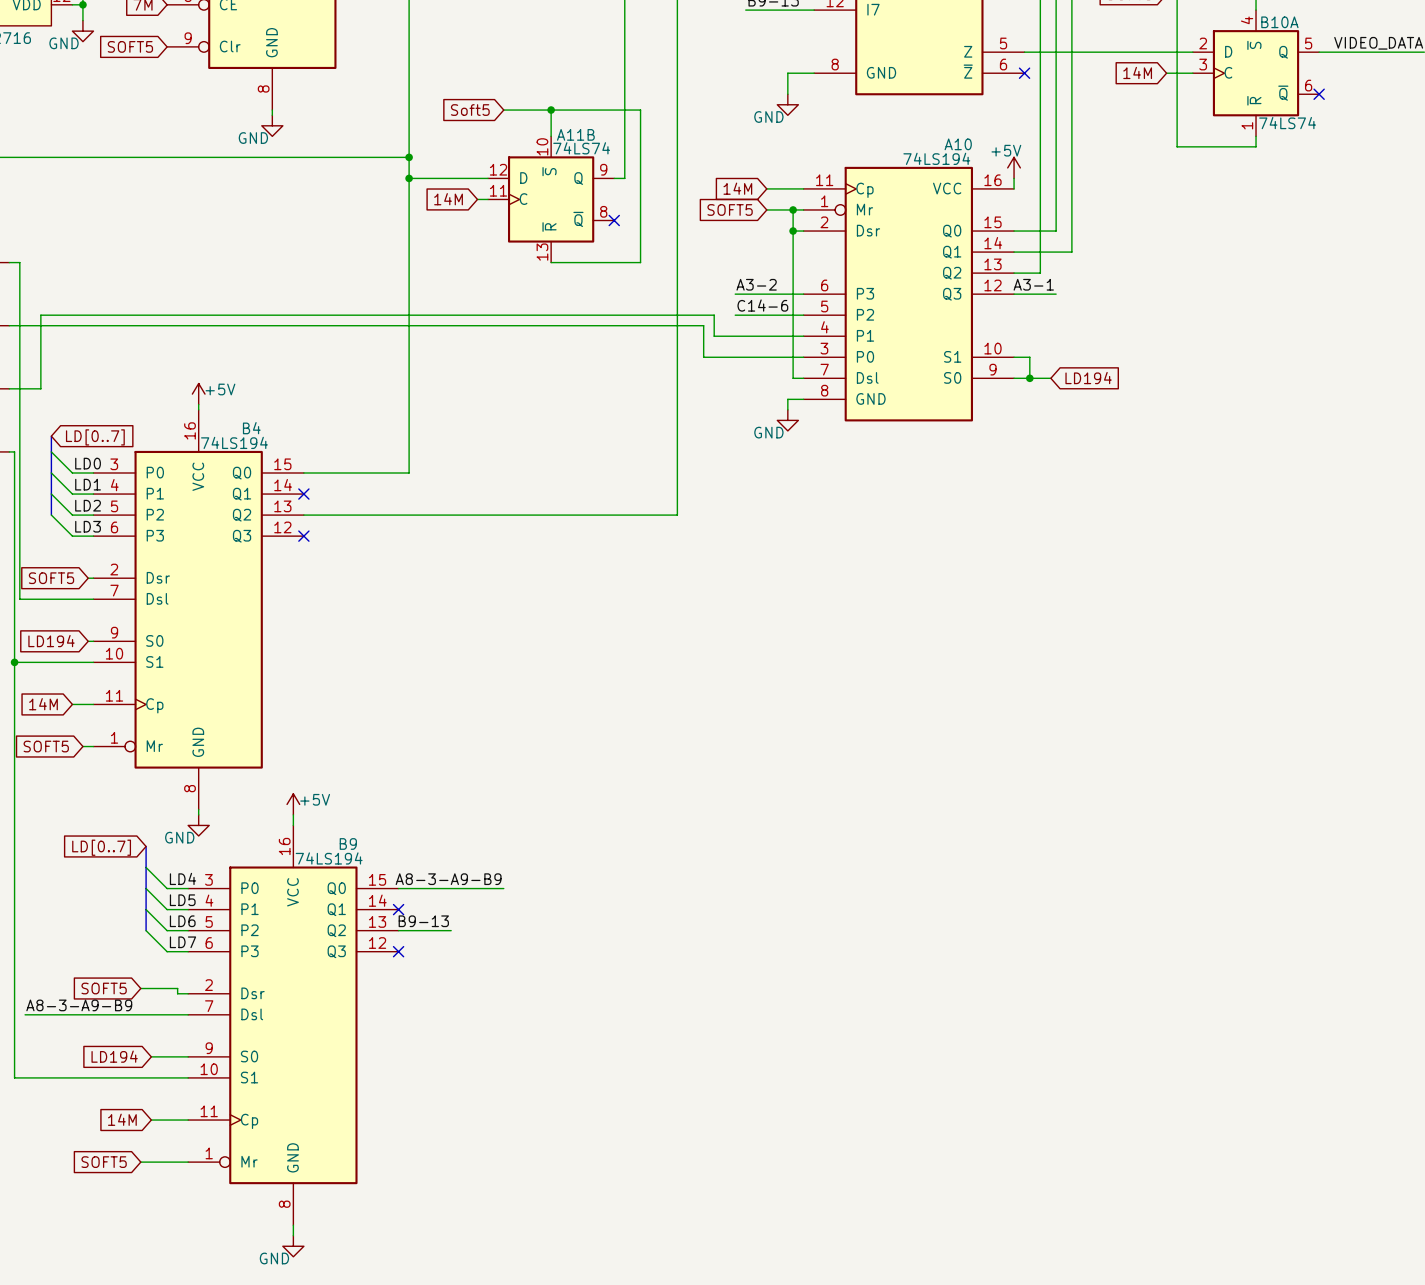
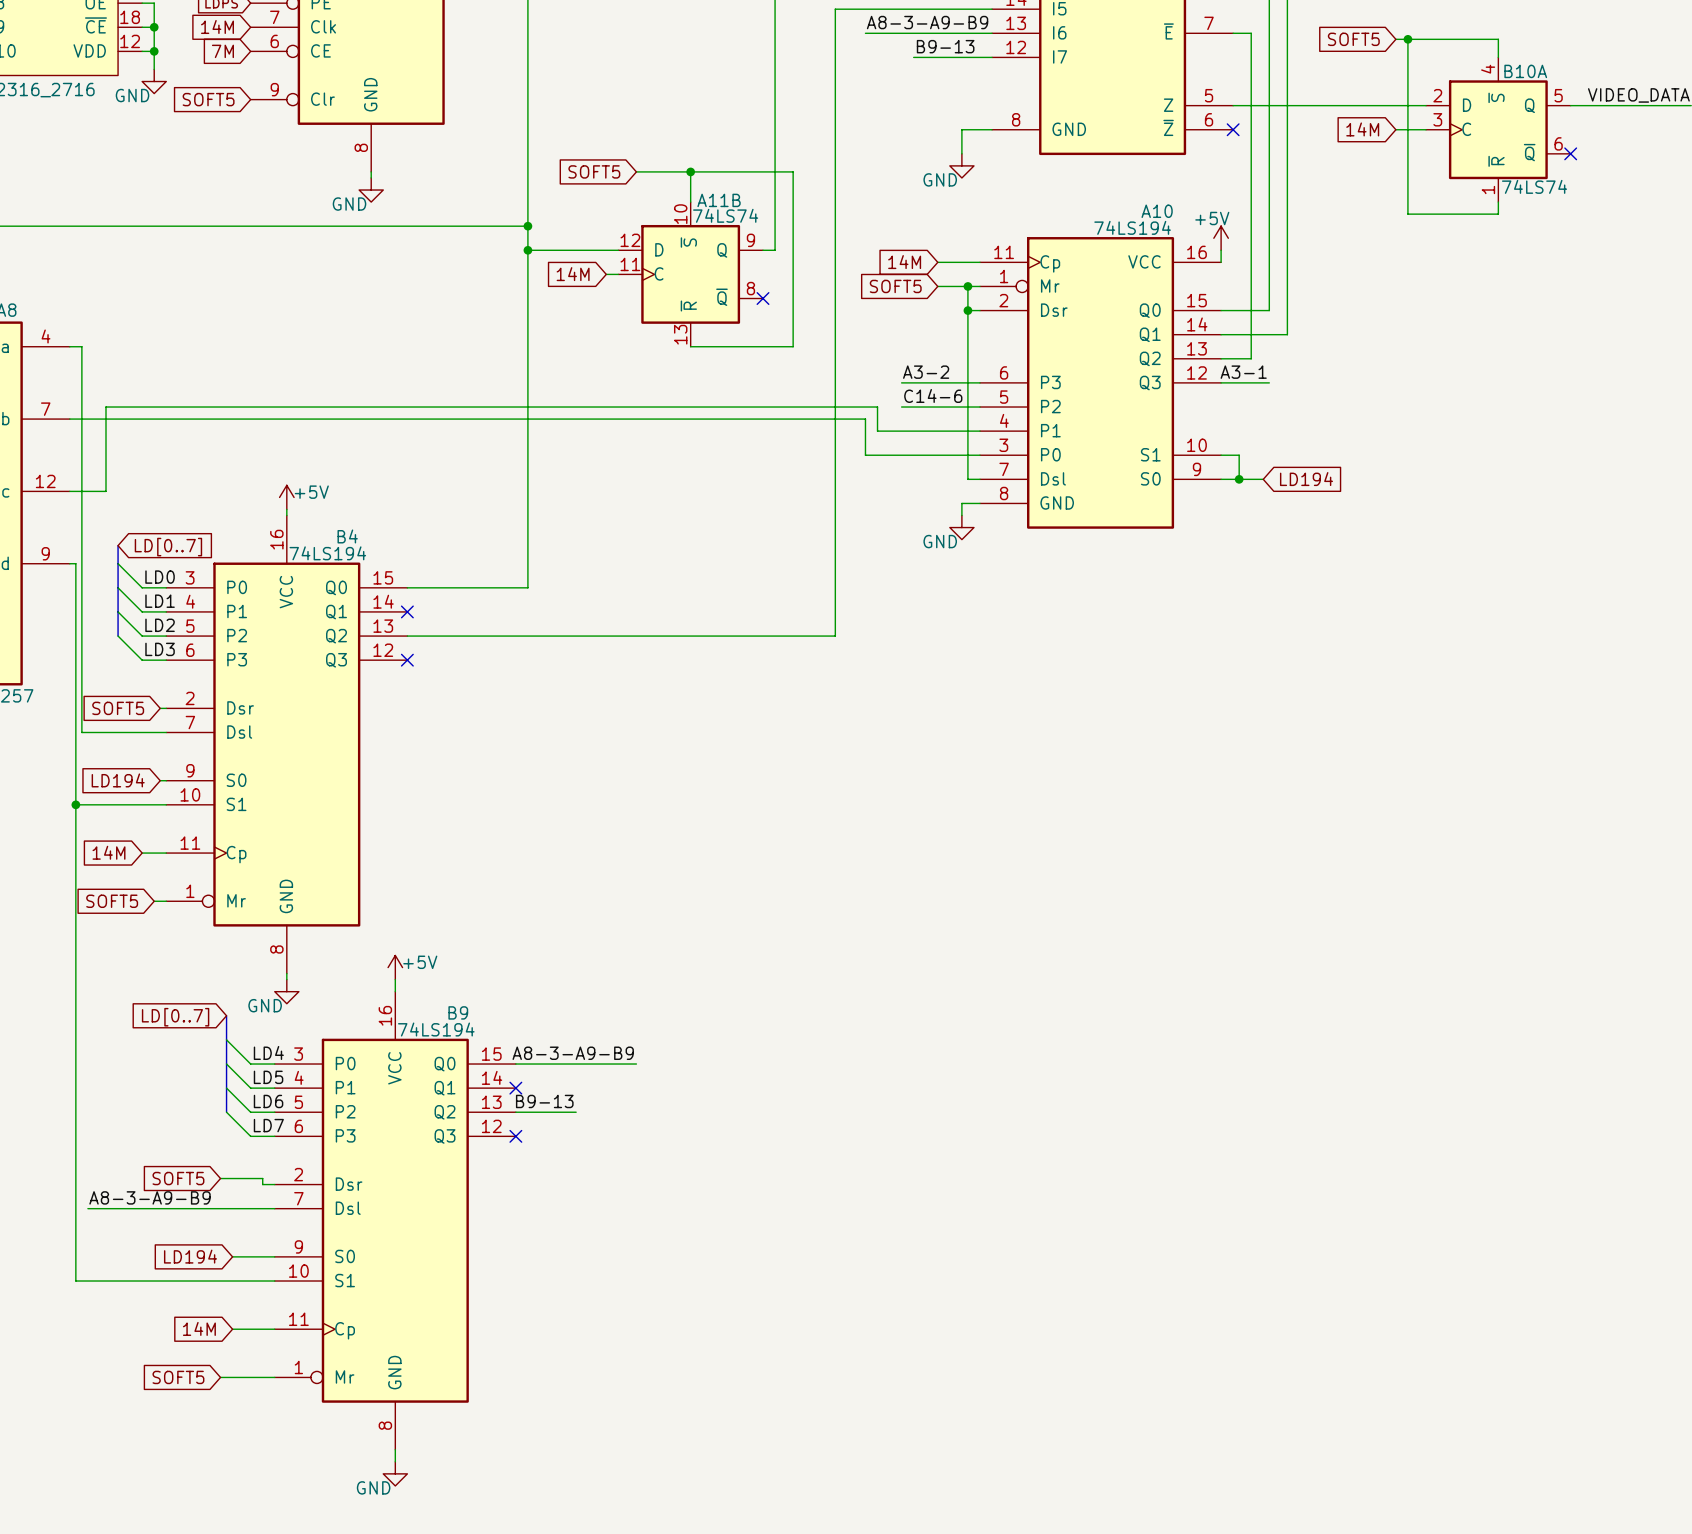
global label: Soft5 (470, 110) -> SOFT5 (594, 171)

